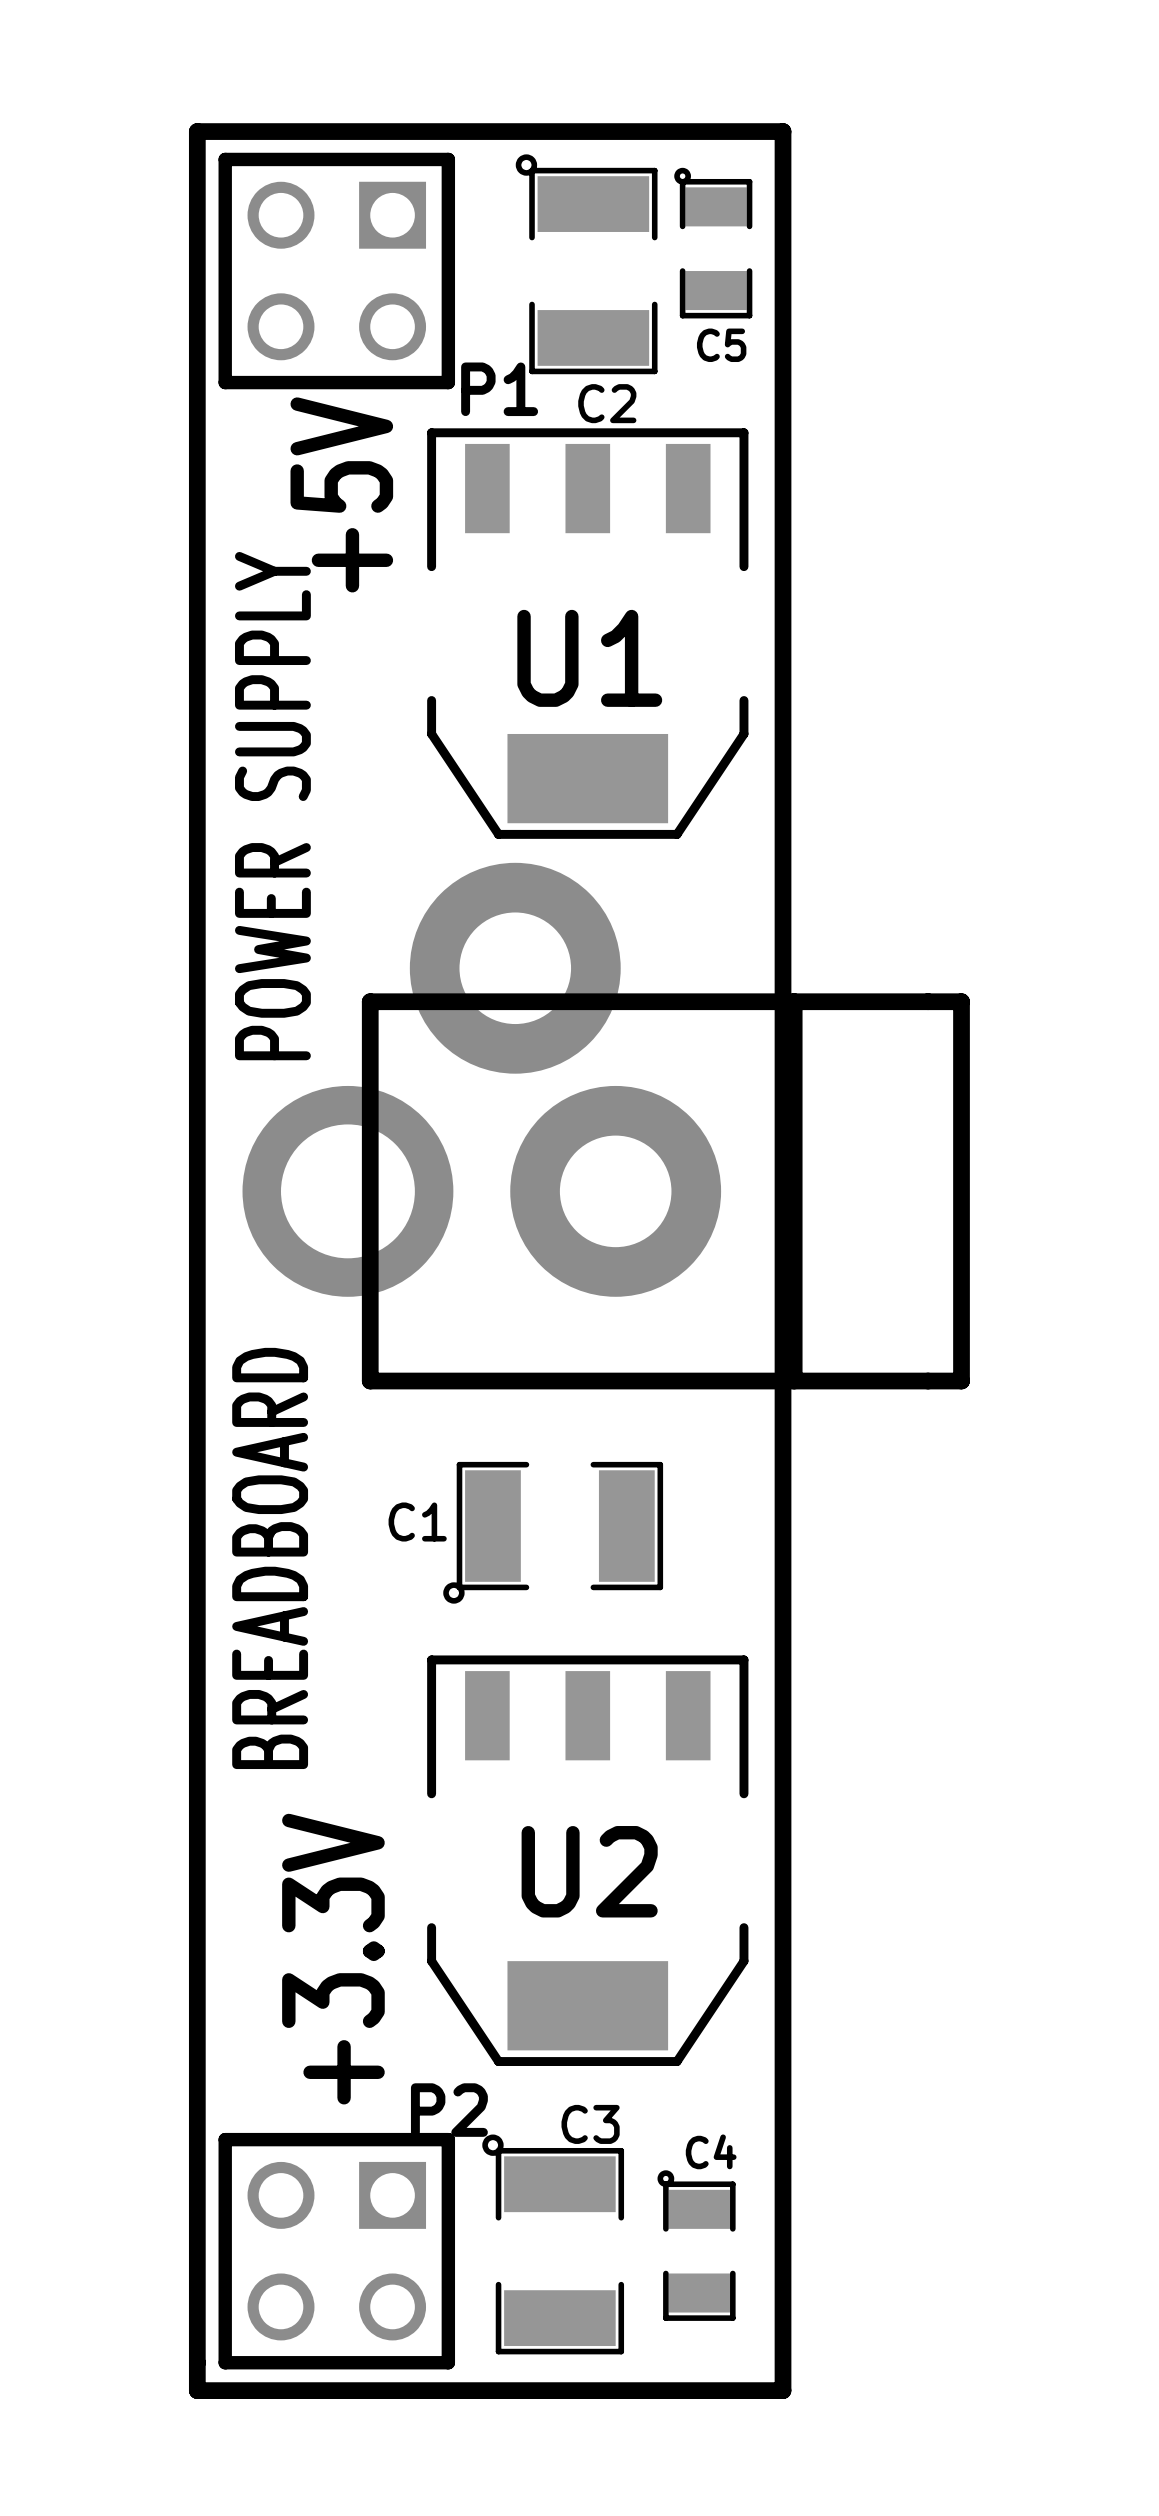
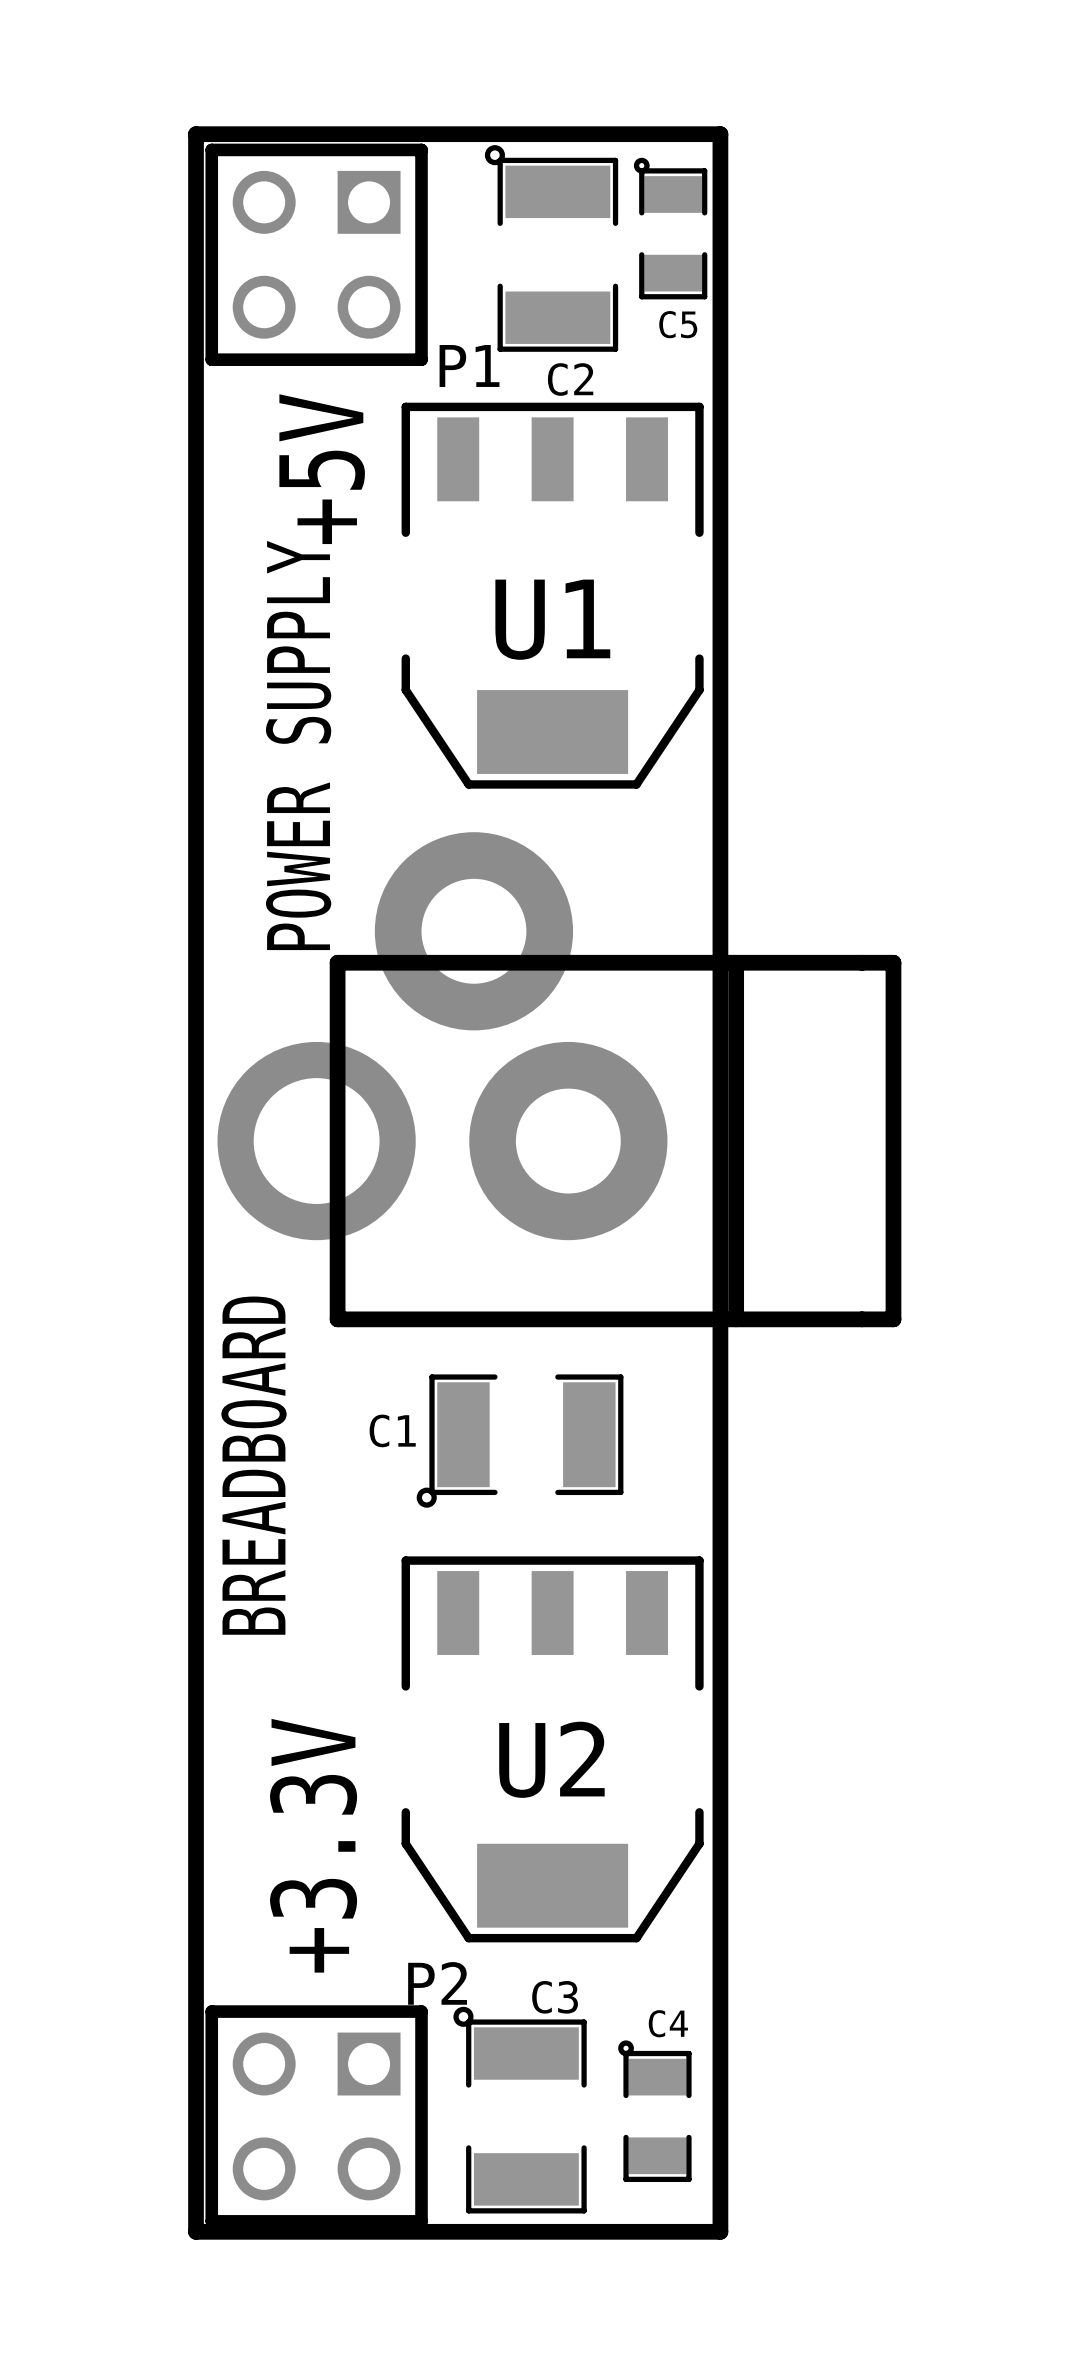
board edge: (197, 131) (783, 131) (783, 2390) (197, 2390) (197, 131) -> (196, 134) (196, 2231) (720, 2231) (720, 134) (196, 134)
text position: POWER SUPPLY (272, 806) -> POWER SUPPLY (298, 745)
part position: (606, 1126) -> (559, 1079)
P2 name position: P2 (449, 2110) -> P2 (437, 1983)

